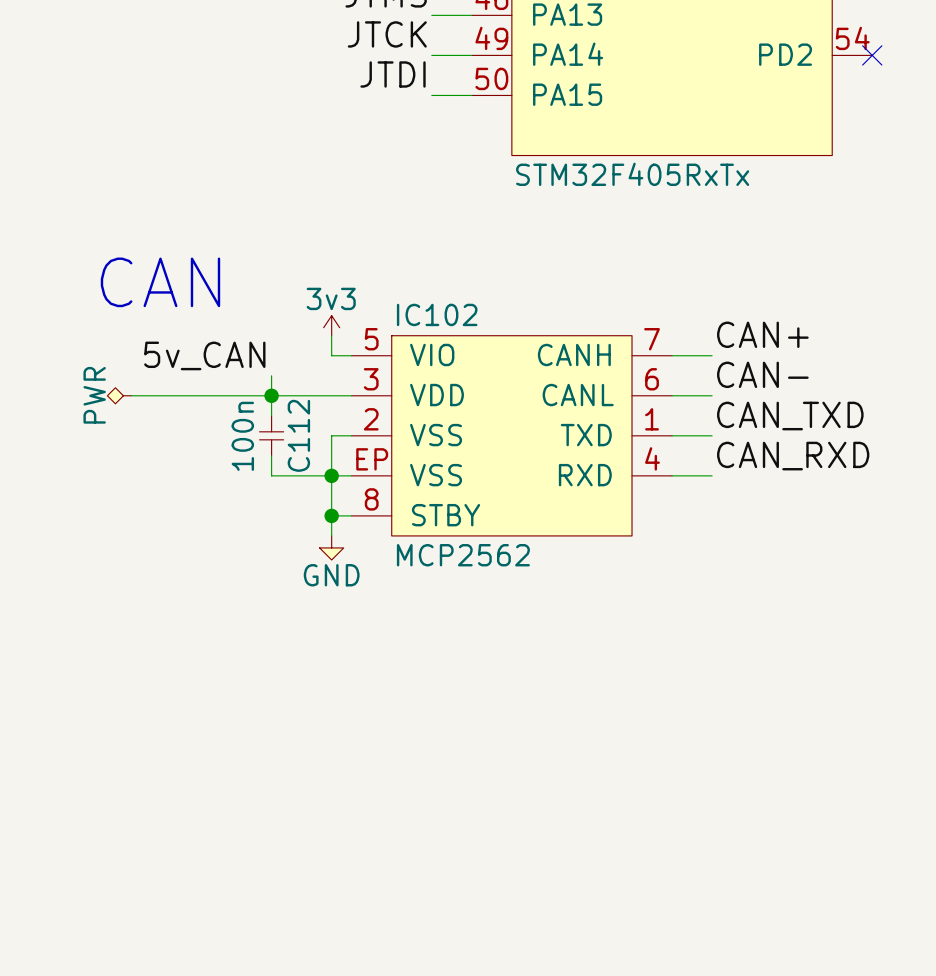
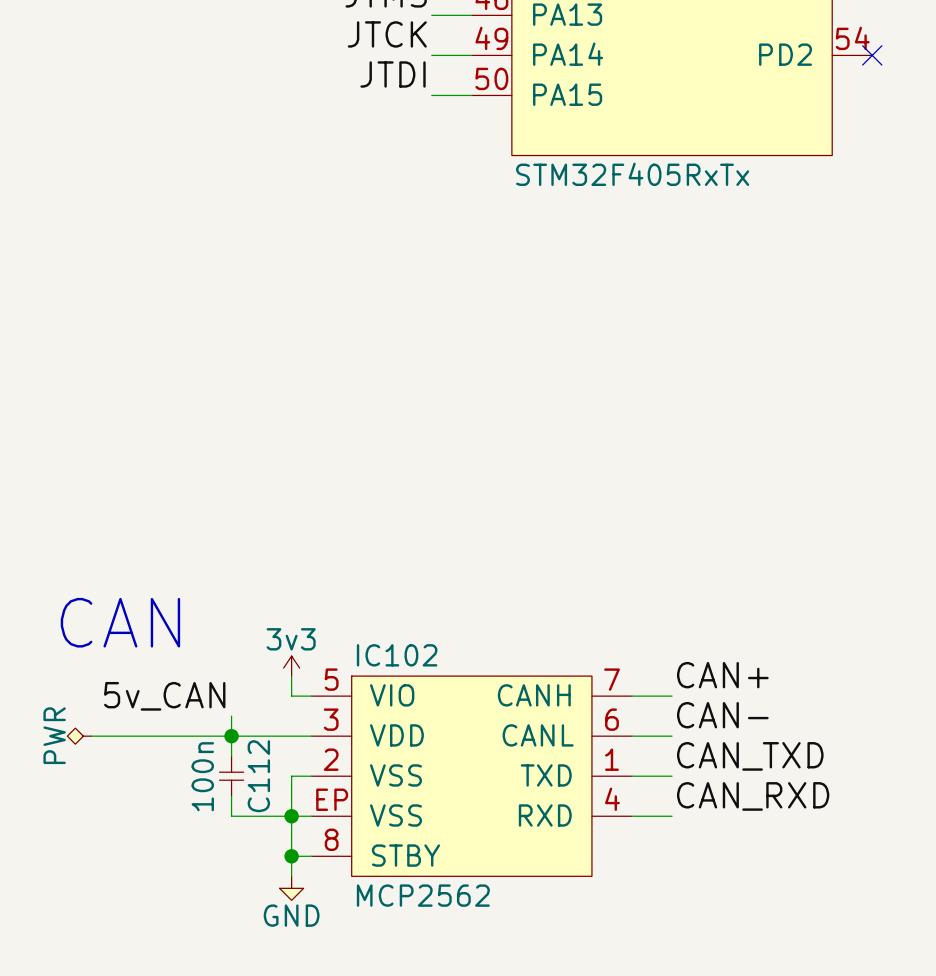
text position: CAN (160, 282) -> CAN (120, 622)
power symbol position: 3v3 (331, 325) -> 3v3 (291, 666)
label position: CAN+ (762, 334) -> CAN+ (722, 675)
wire: (331, 335) (331, 355) (351, 355) -> (291, 676) (291, 696) (311, 696)
label position: 5v_CAN (204, 355) -> 5v_CAN (164, 696)
wire: (672, 355) (712, 355) -> (632, 696) (672, 696)
label position: CAN- (762, 374) -> CAN- (722, 715)
wire: (271, 375) (271, 415) -> (231, 716) (231, 756)
power symbol position: PWR (119, 395) -> PWR (79, 736)
wire: (131, 395) (351, 395) -> (91, 736) (311, 736)
junction: (271, 395) -> none
wire: (672, 395) (712, 395) -> (632, 736) (672, 736)
label position: CAN_TXD (790, 416) -> CAN_TXD (750, 756)
C112 position: (271, 435) -> (231, 776)
wire: (351, 435) (331, 435) (331, 535) -> (311, 776) (291, 776) (291, 876)
IC102 position: (511, 435) -> (471, 776)
wire: (672, 435) (712, 435) -> (632, 776) (672, 776)
wire: (271, 455) (271, 475) (351, 475) -> (231, 796) (231, 816) (311, 816)
label position: CAN_RXD (793, 456) -> CAN_RXD (753, 796)
junction: (331, 475) -> none
wire: (672, 475) (712, 475) -> (632, 816) (672, 816)
wire: (331, 515) (351, 515) -> (291, 856) (311, 856)
junction: (331, 515) -> none
power symbol position: GND (331, 547) -> GND (291, 888)
junction: none -> (231, 736)
junction: none -> (291, 816)
junction: none -> (291, 856)

